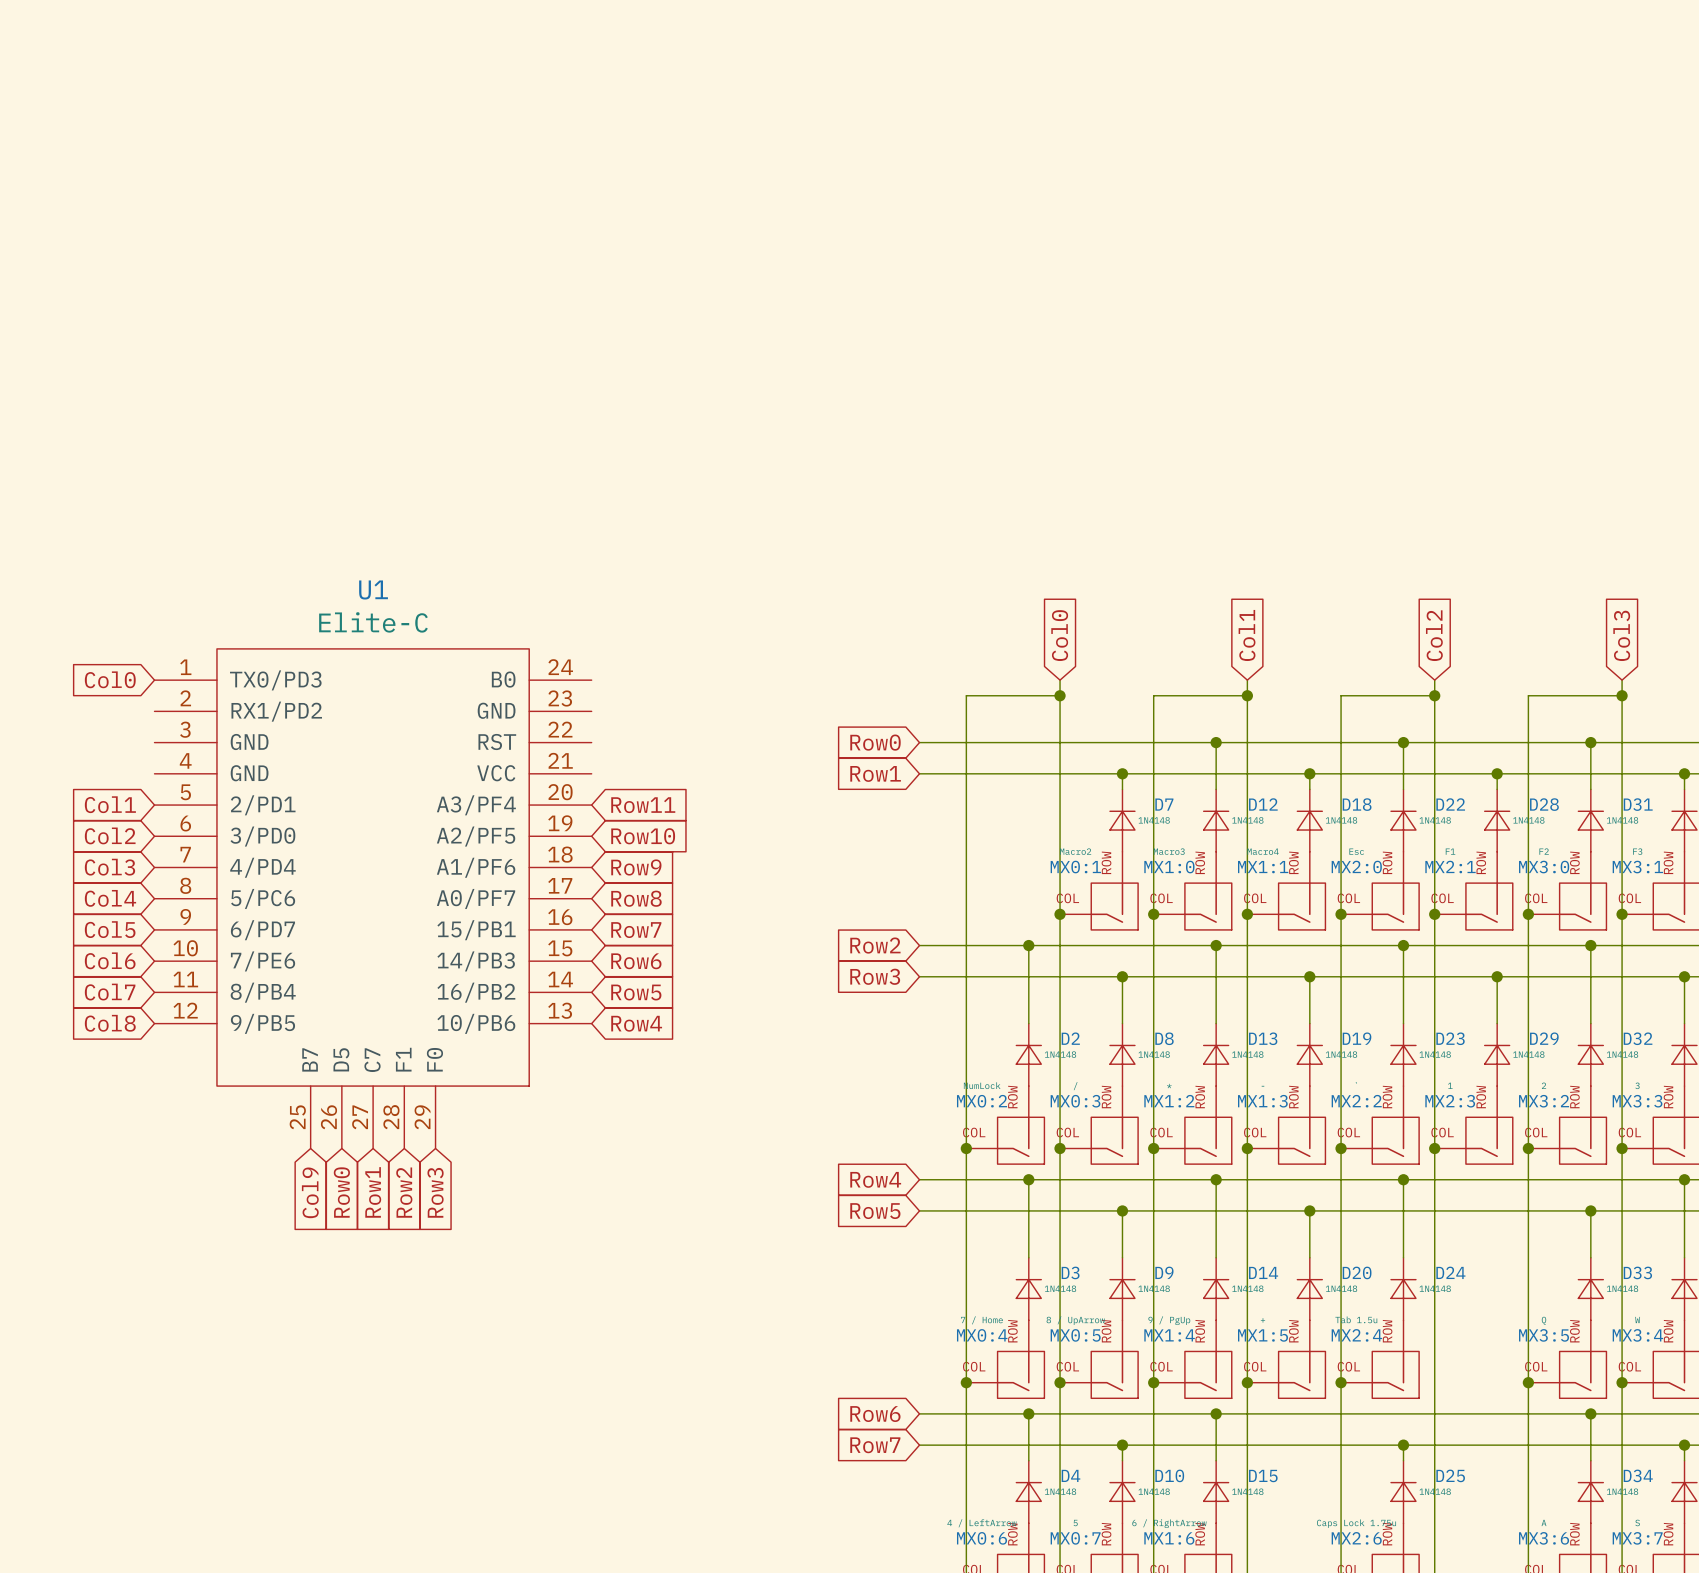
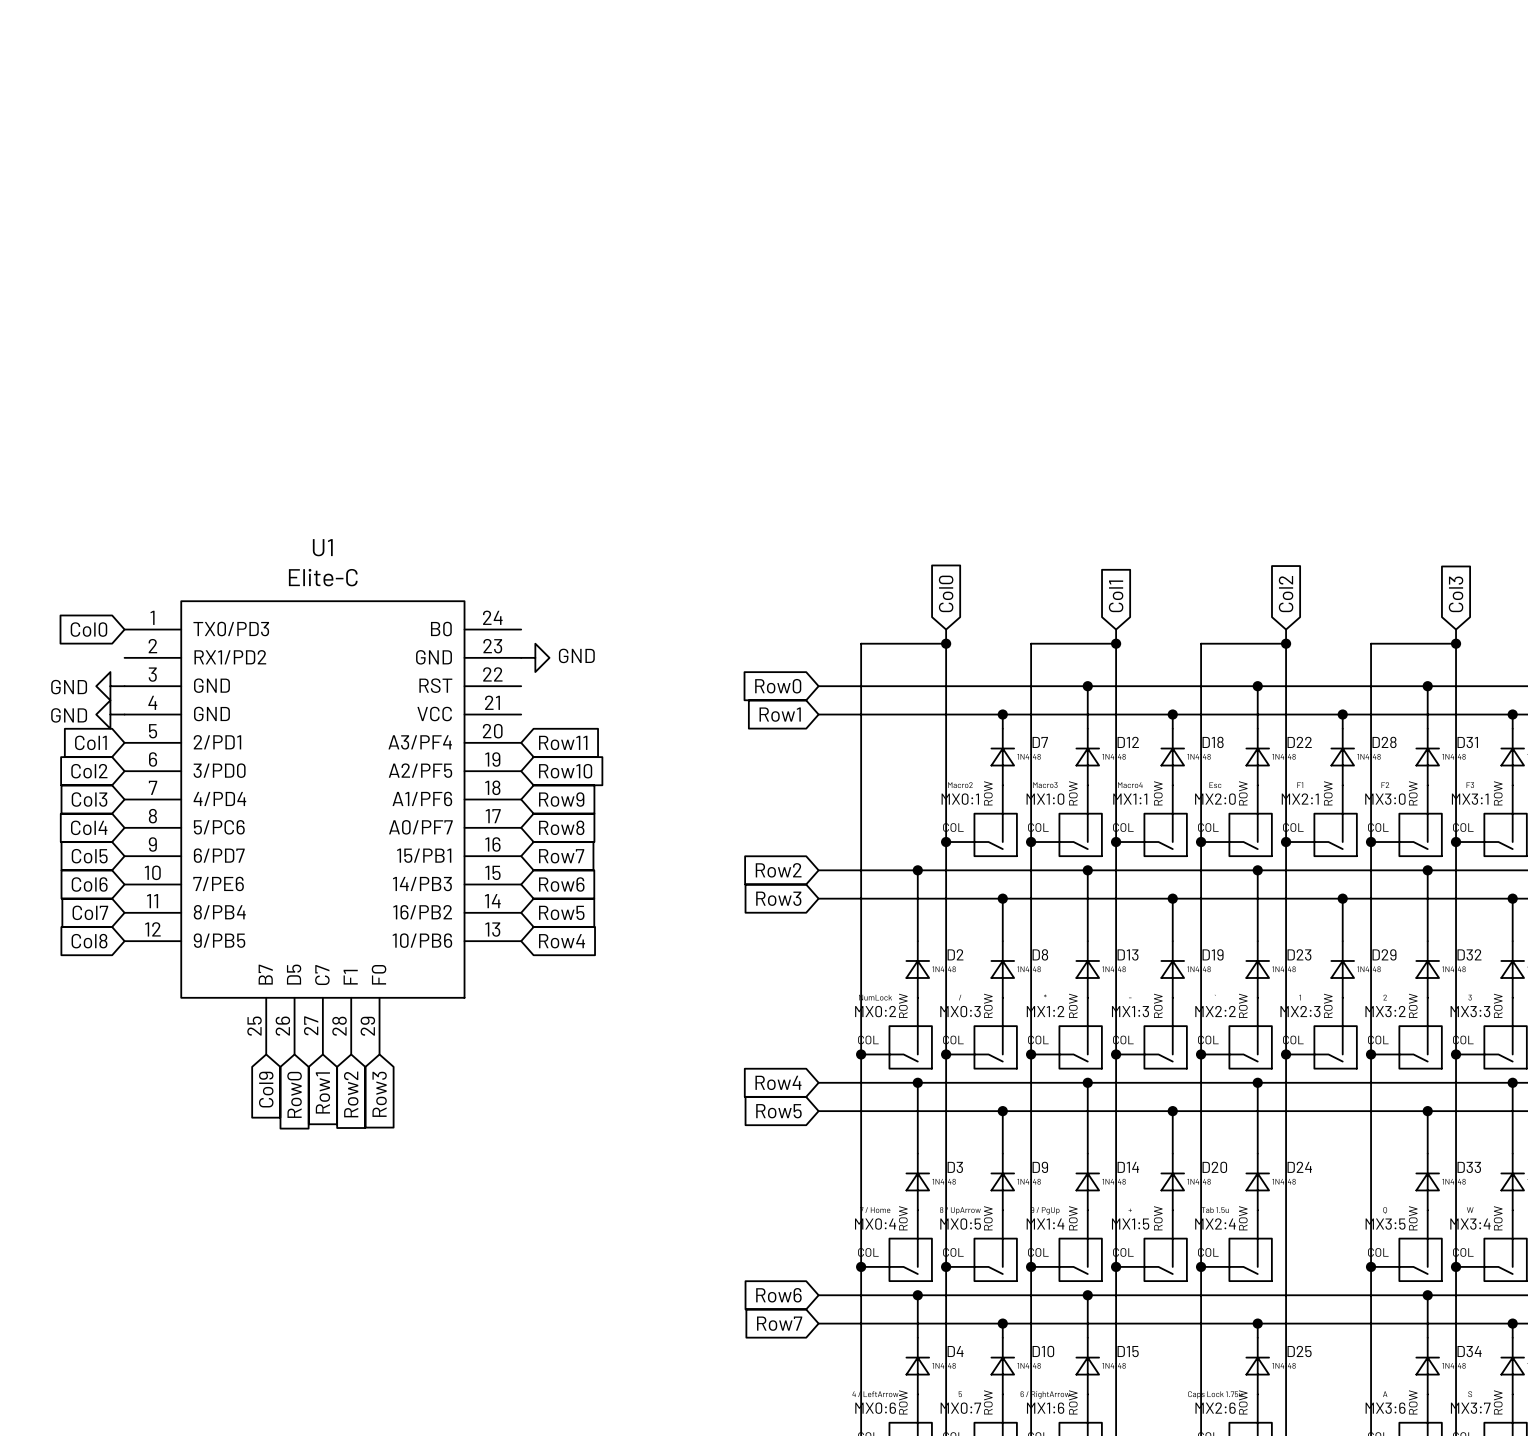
power symbol: none -> GND (535, 657)
power symbol: none -> GND (110, 686)
power symbol: none -> GND (110, 714)

